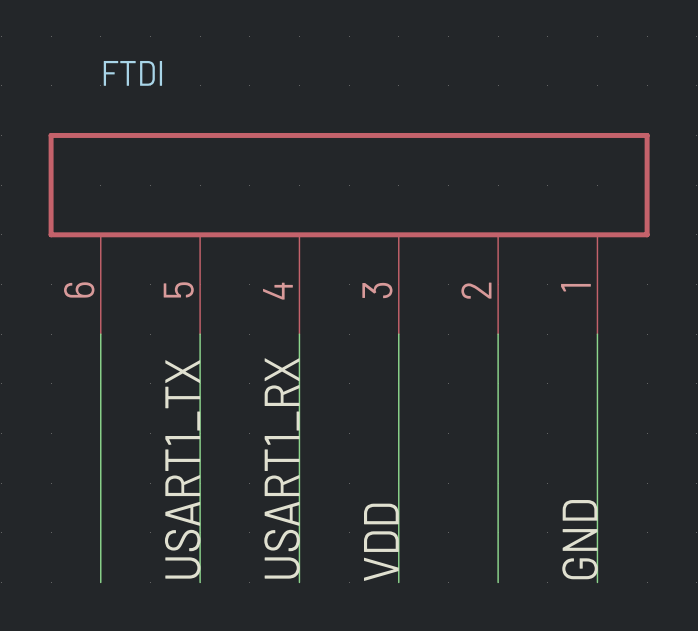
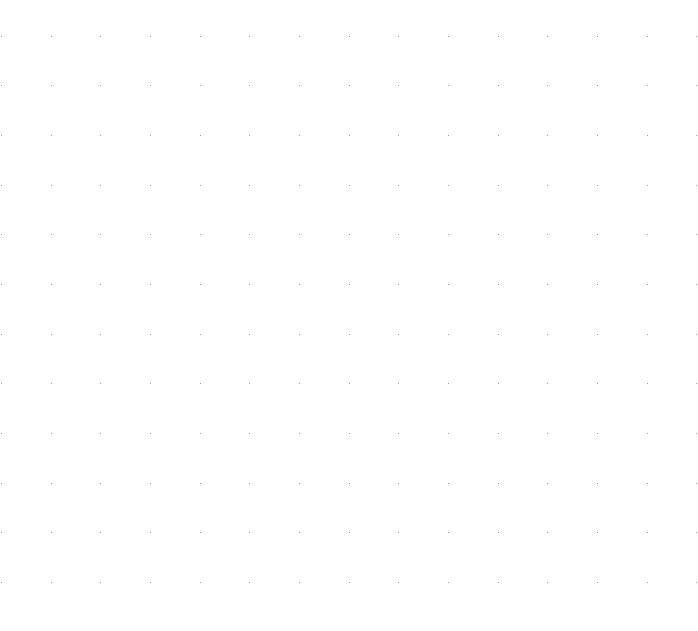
FTDI: (349, 233) -> none
wire: (100, 334) (100, 582) -> none
wire: (200, 334) (200, 582) -> none
wire: (299, 334) (299, 582) -> none
wire: (398, 334) (398, 582) -> none
wire: (498, 334) (498, 582) -> none
wire: (597, 334) (597, 582) -> none
label: USART1_RX (282, 468) -> none
label: USART1_TX (182, 469) -> none
label: GND (580, 539) -> none
label: VDD (381, 542) -> none

